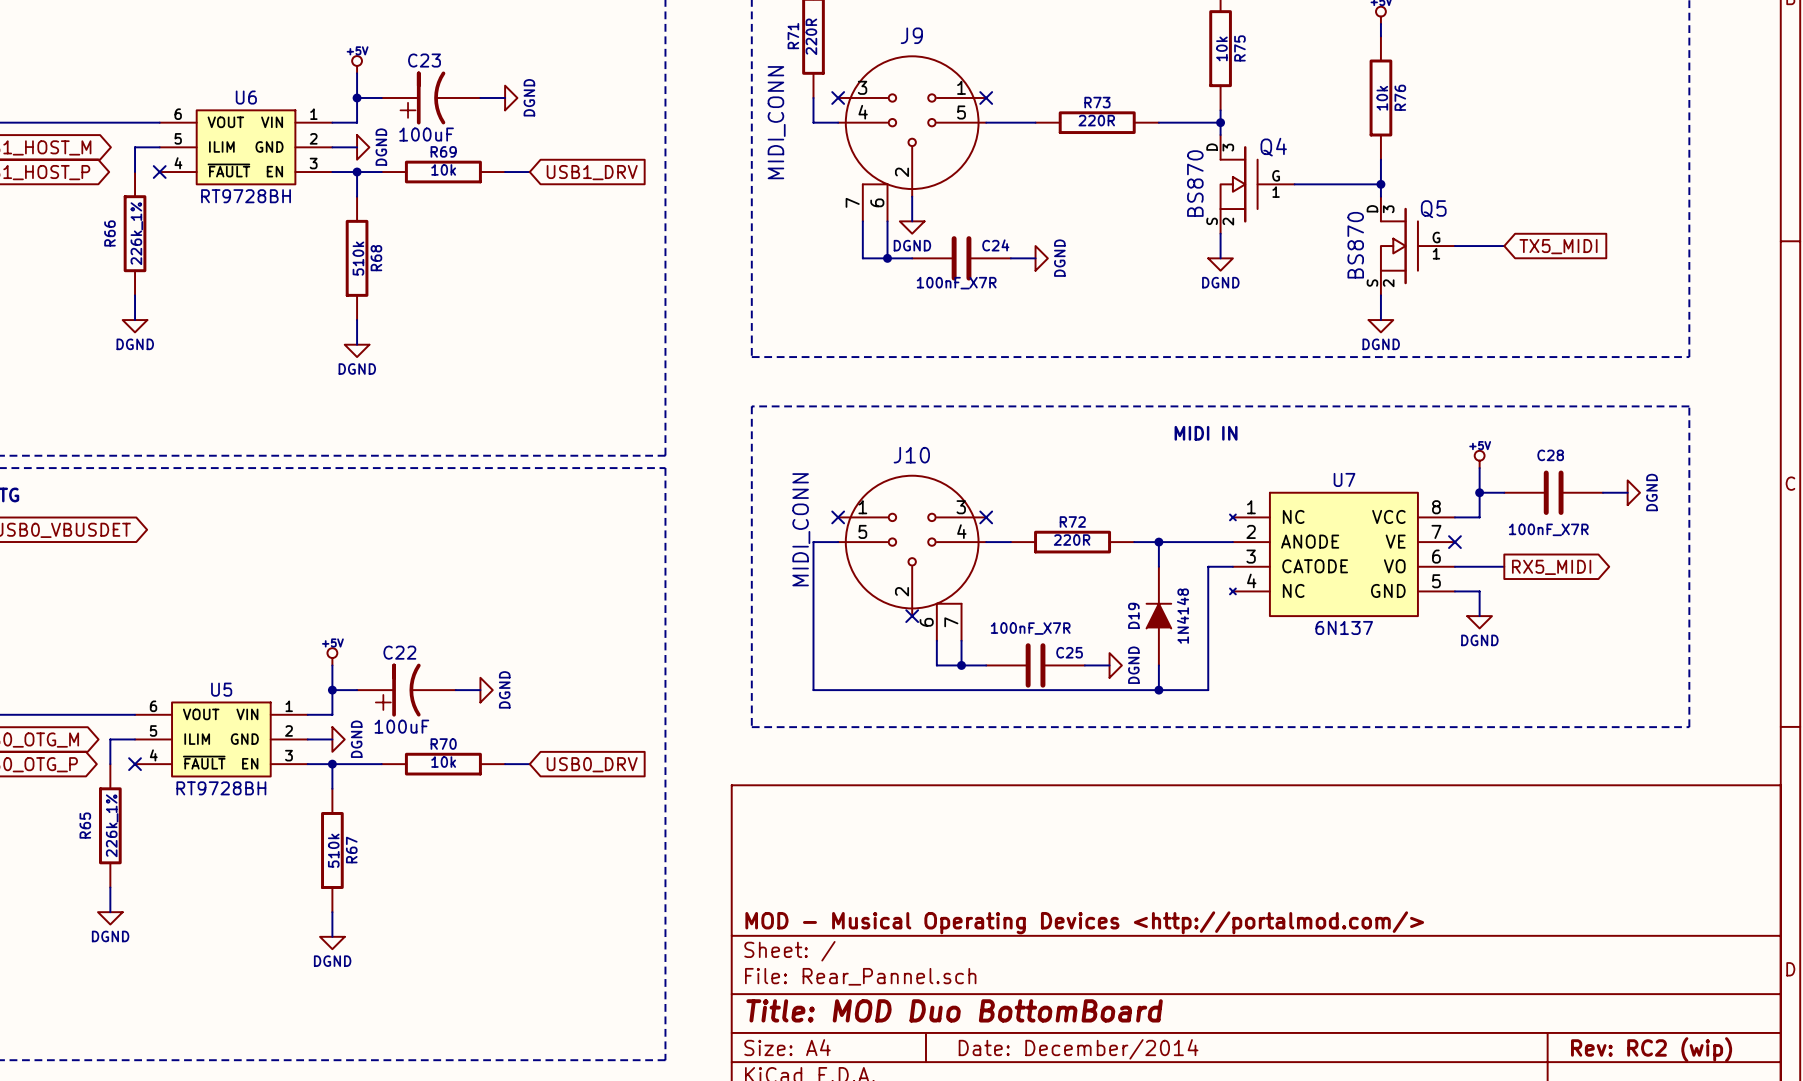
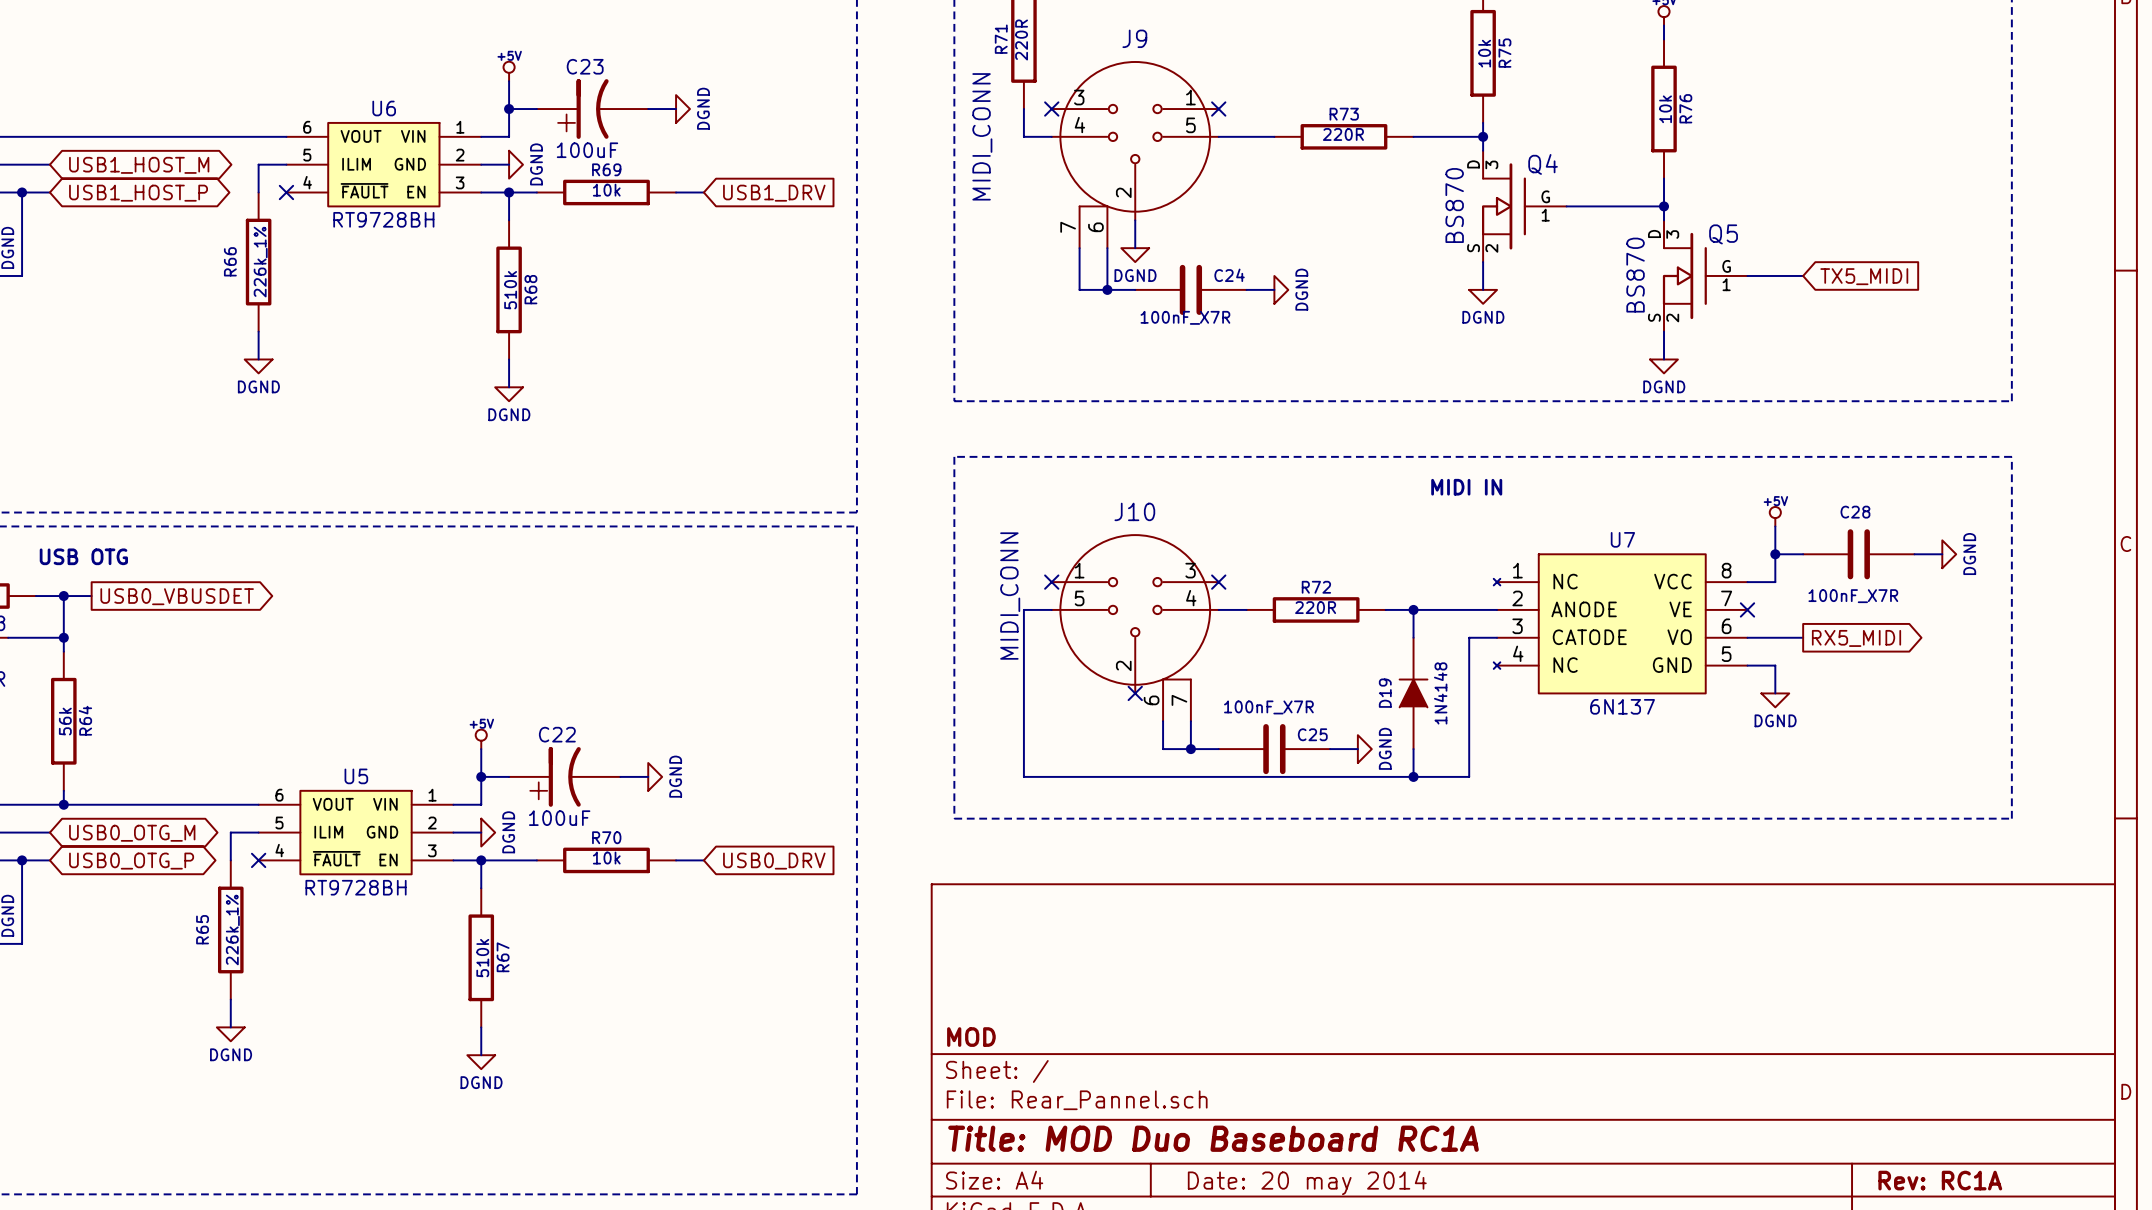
title block: MOD - Musical Operating Devices <http://portalmod.com/> (1084, 922) -> MOD (971, 1037)
title block: Title: MOD Duo BottomBoard (954, 1010) -> Title: MOD Duo Baseboard RC1A (1213, 1138)
title block: Date: December/2014 (1078, 1049) -> Date: 20 may 2014 (1307, 1182)
title block: Rev: RC2 (wip) (1651, 1049) -> Rev: RC1A (1940, 1180)

